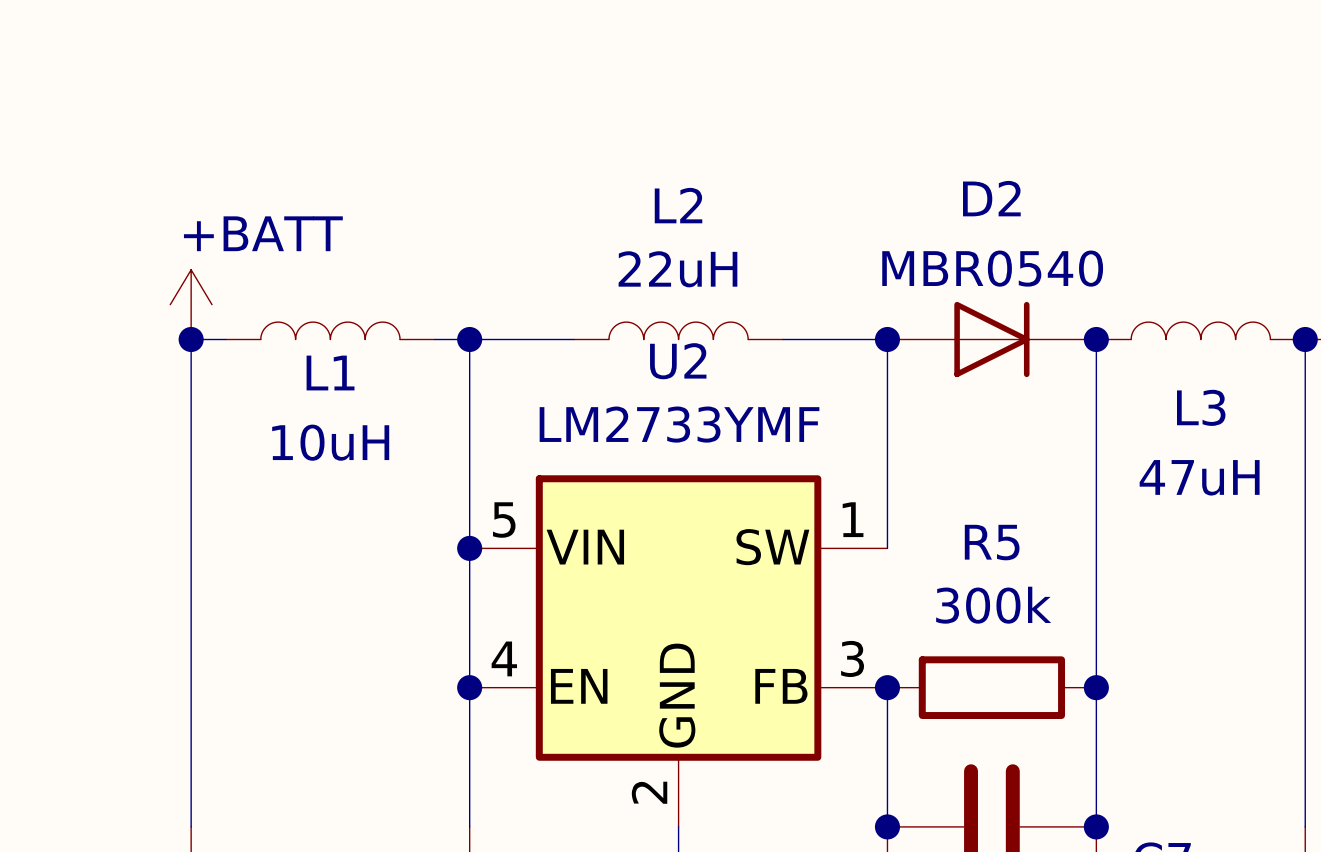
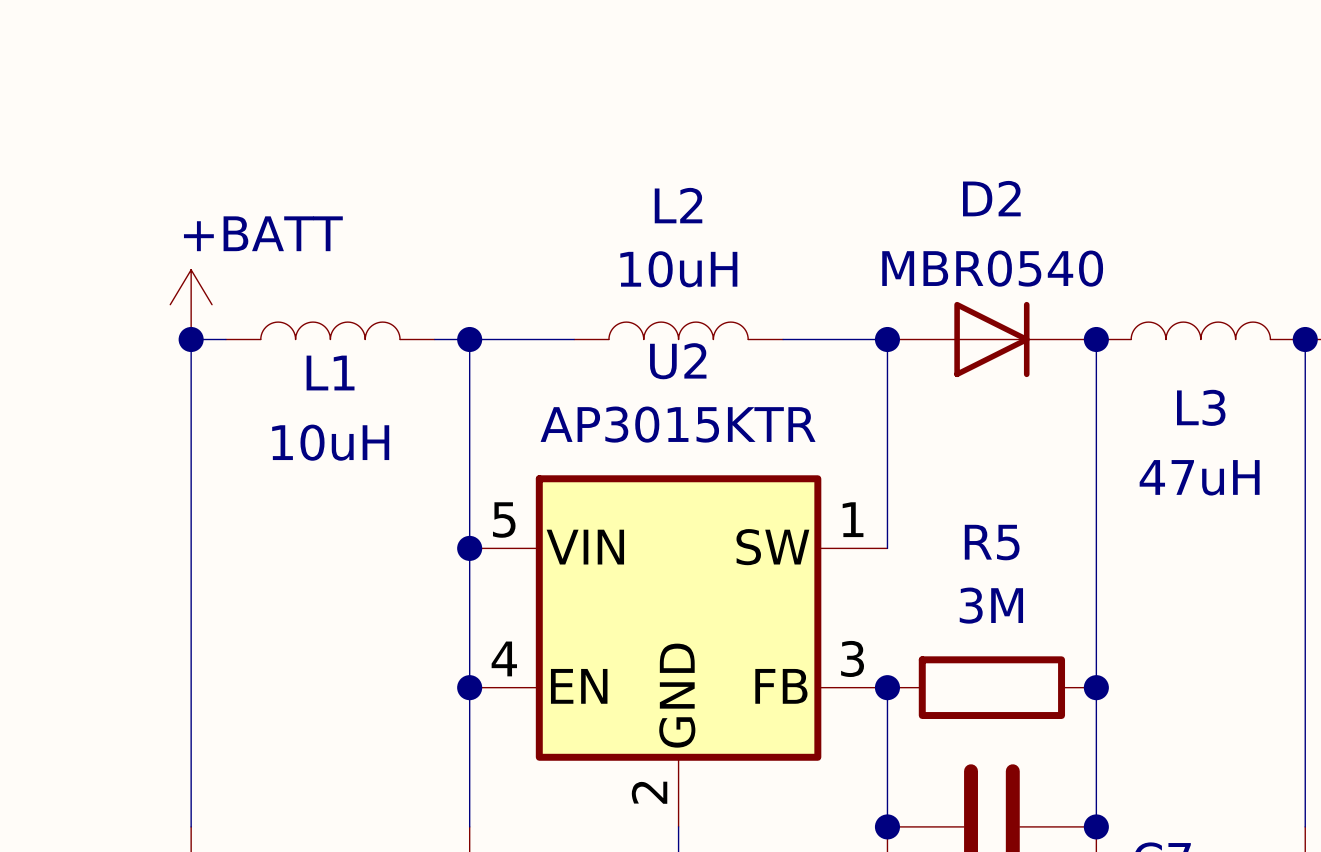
L2 value: 22uH (677, 269) -> 10uH (678, 269)
U2 value: LM2733YMF (679, 424) -> AP3015KTR (678, 424)
R5 value: 300k (993, 605) -> 3M (991, 605)

